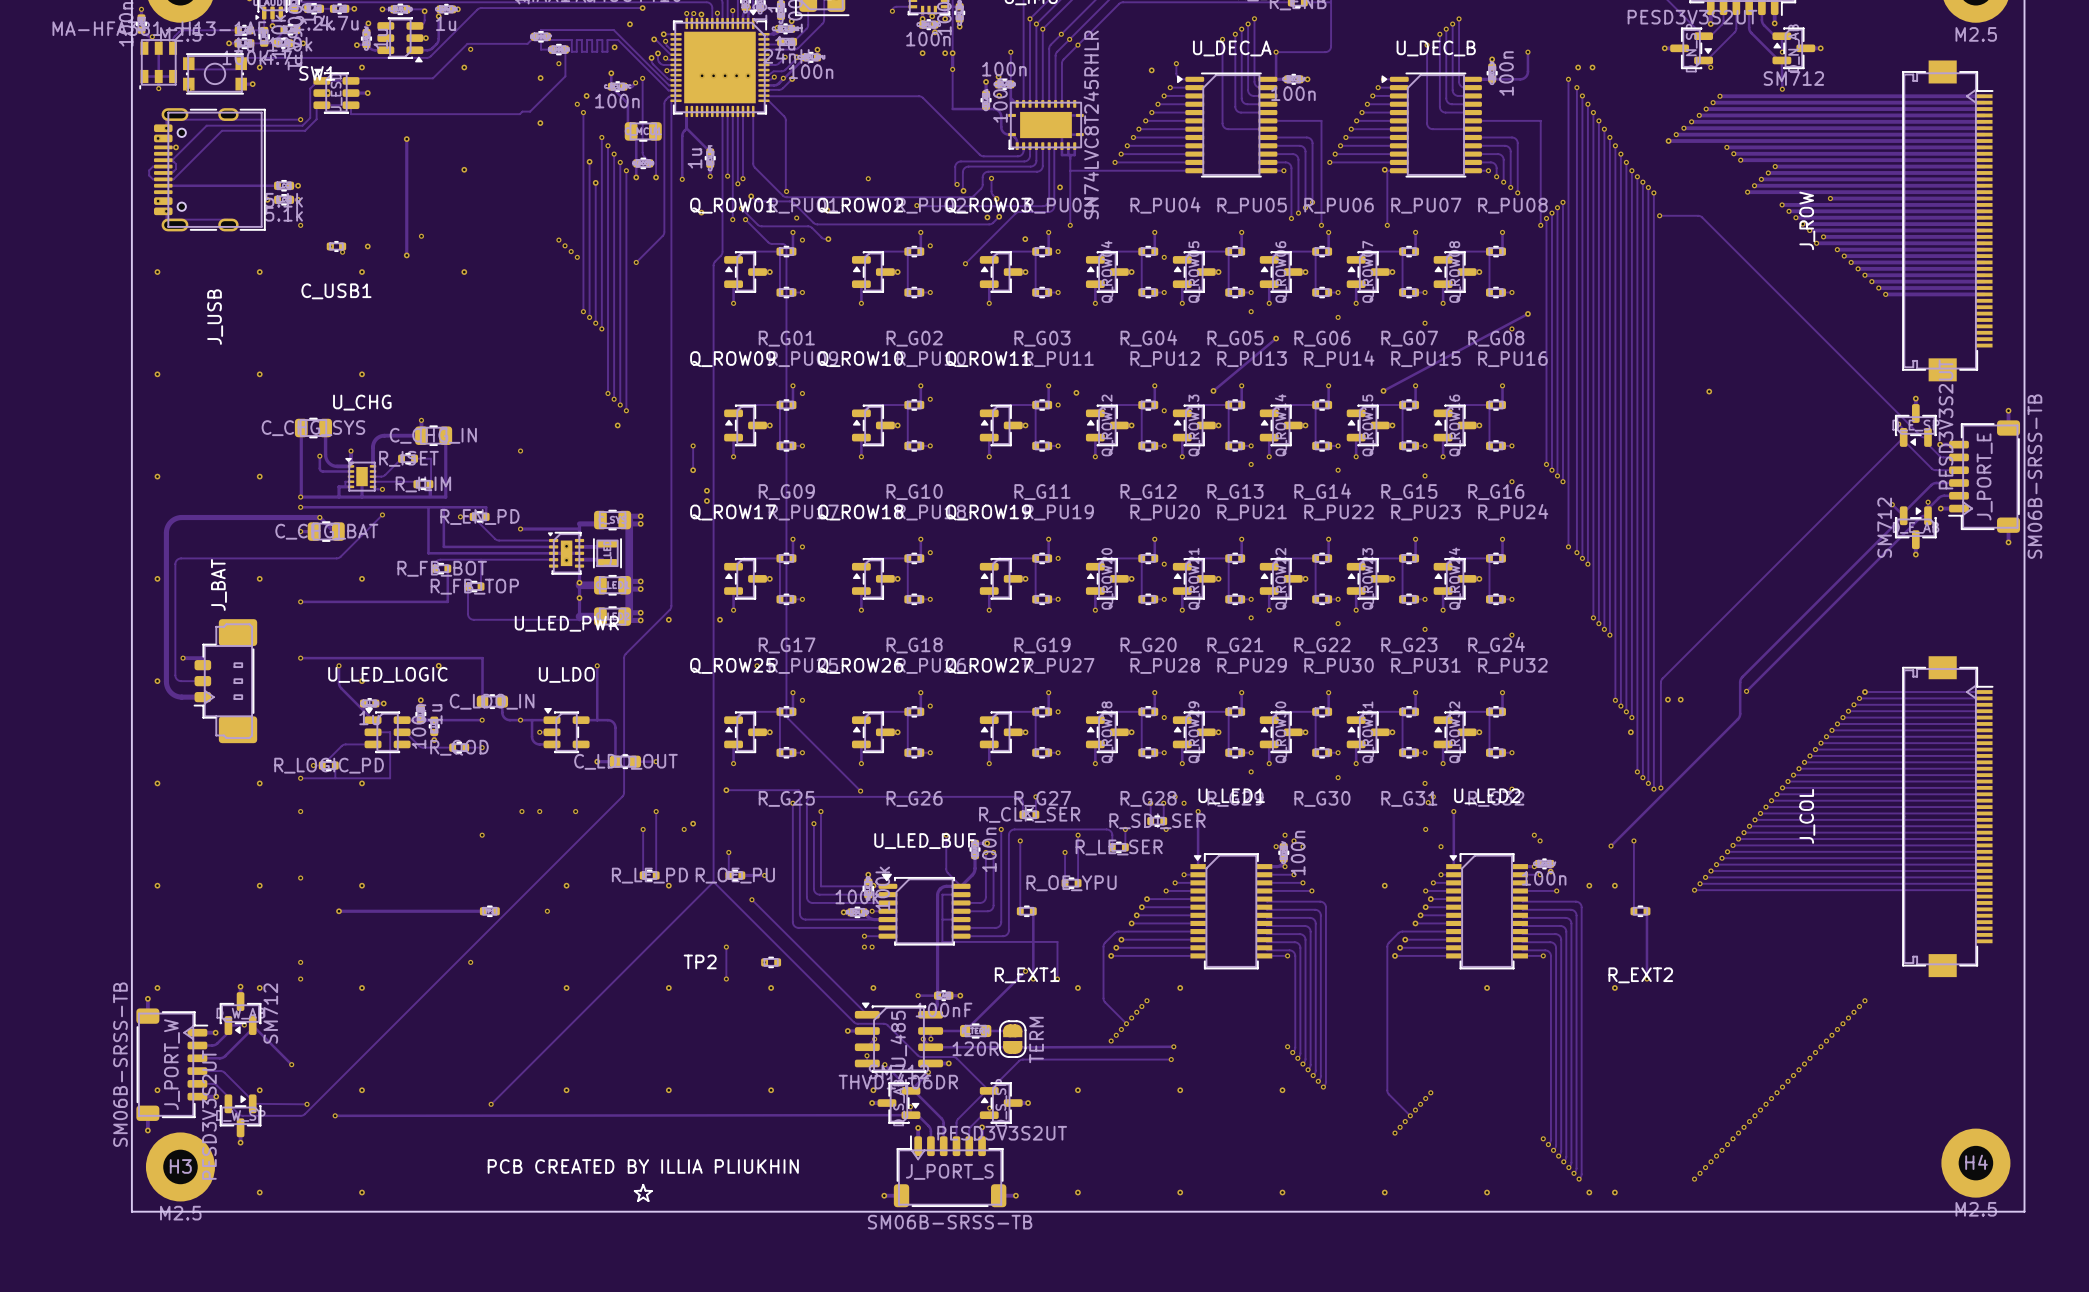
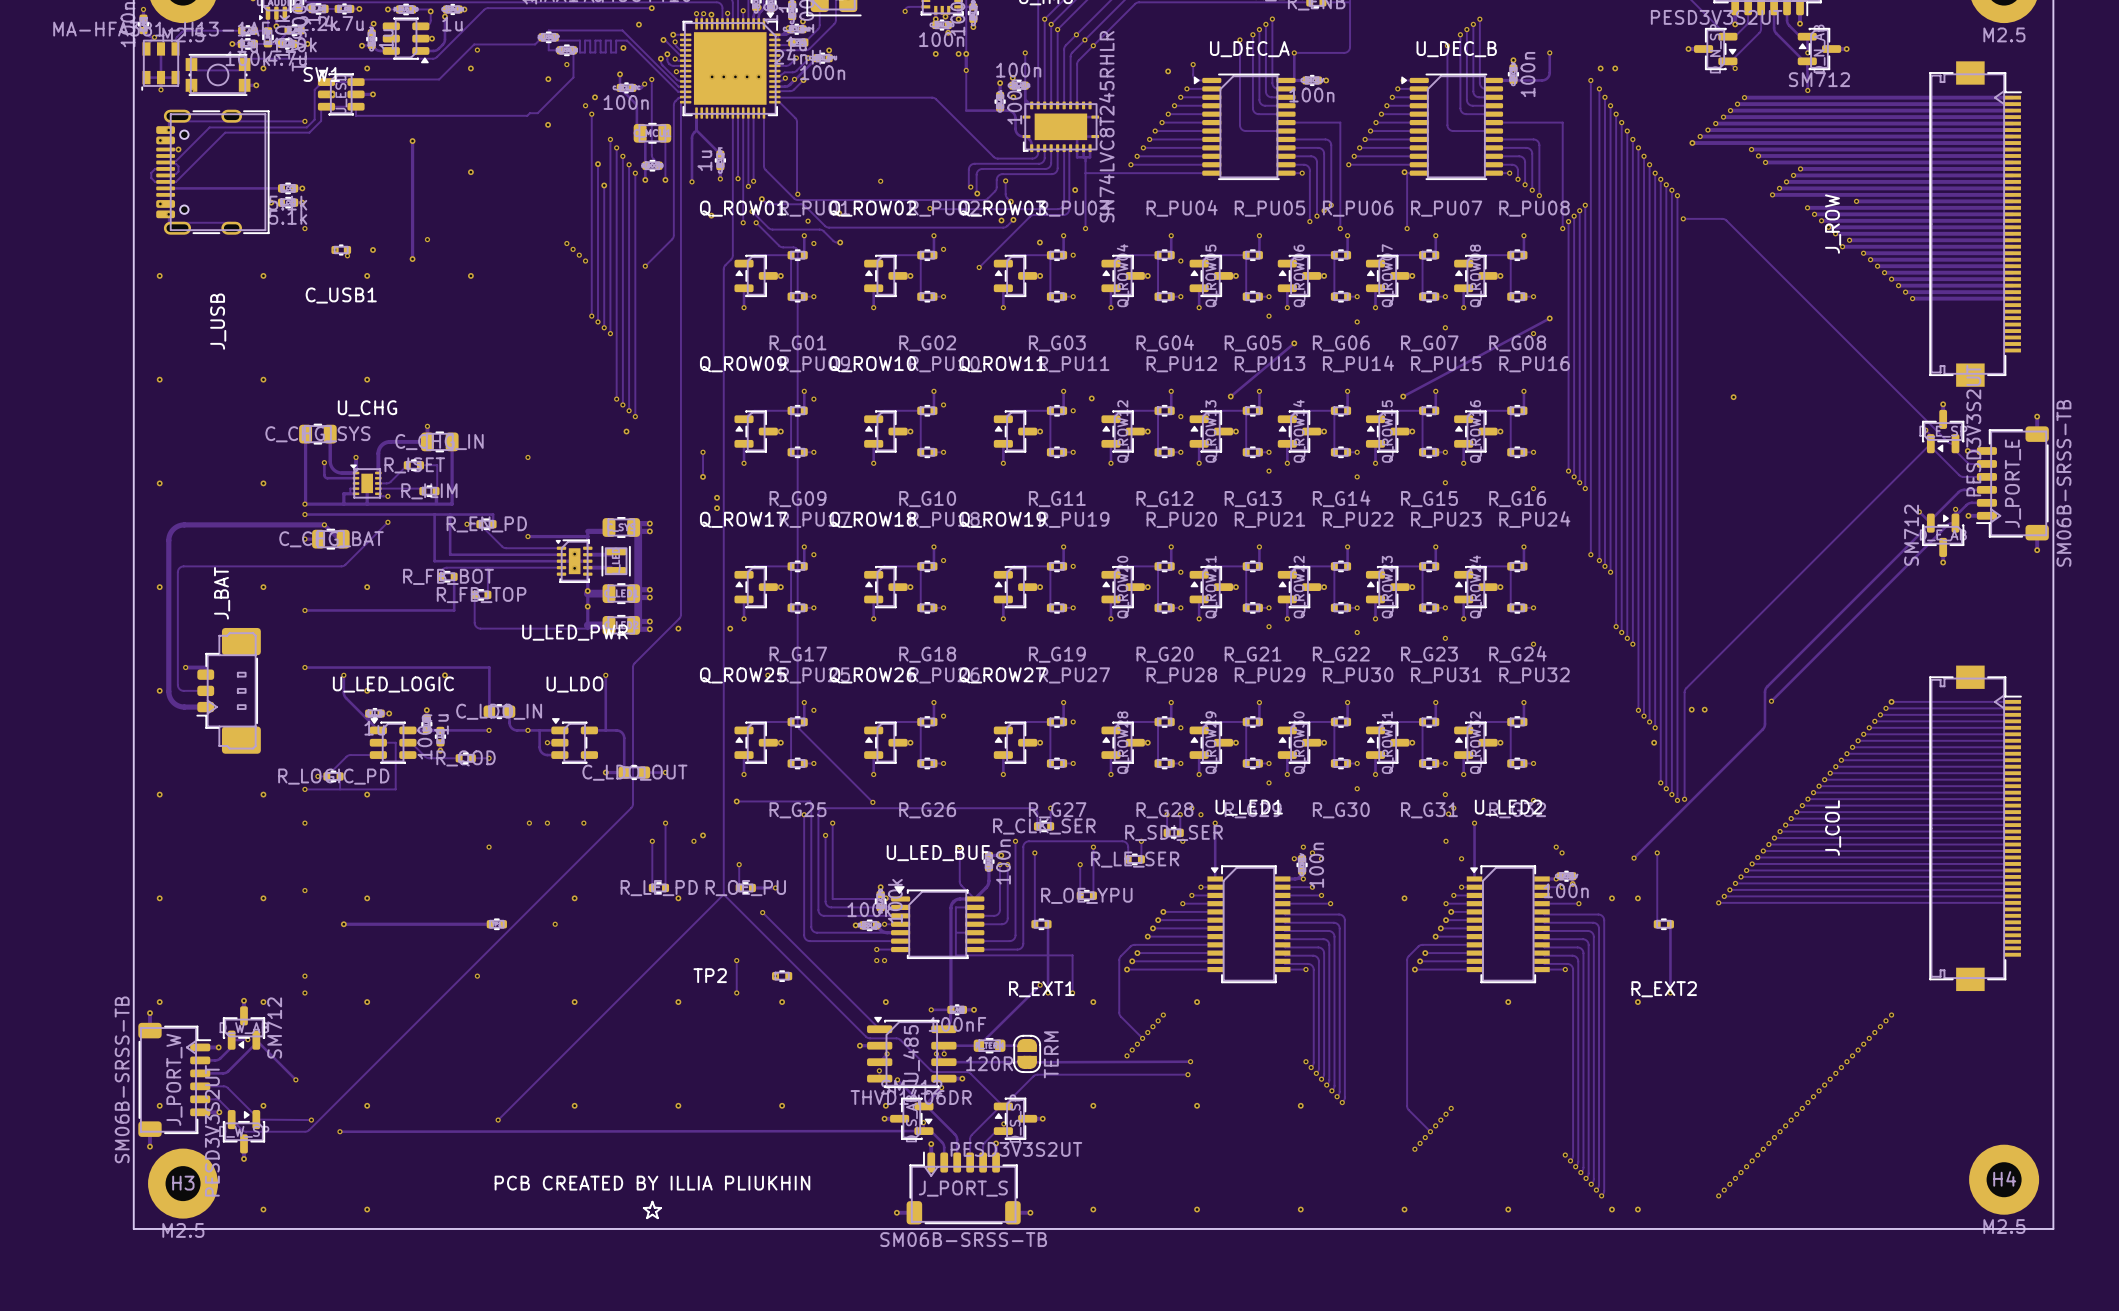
part footprint: [670, 9, 770, 118] -> [680, 12, 781, 119]

